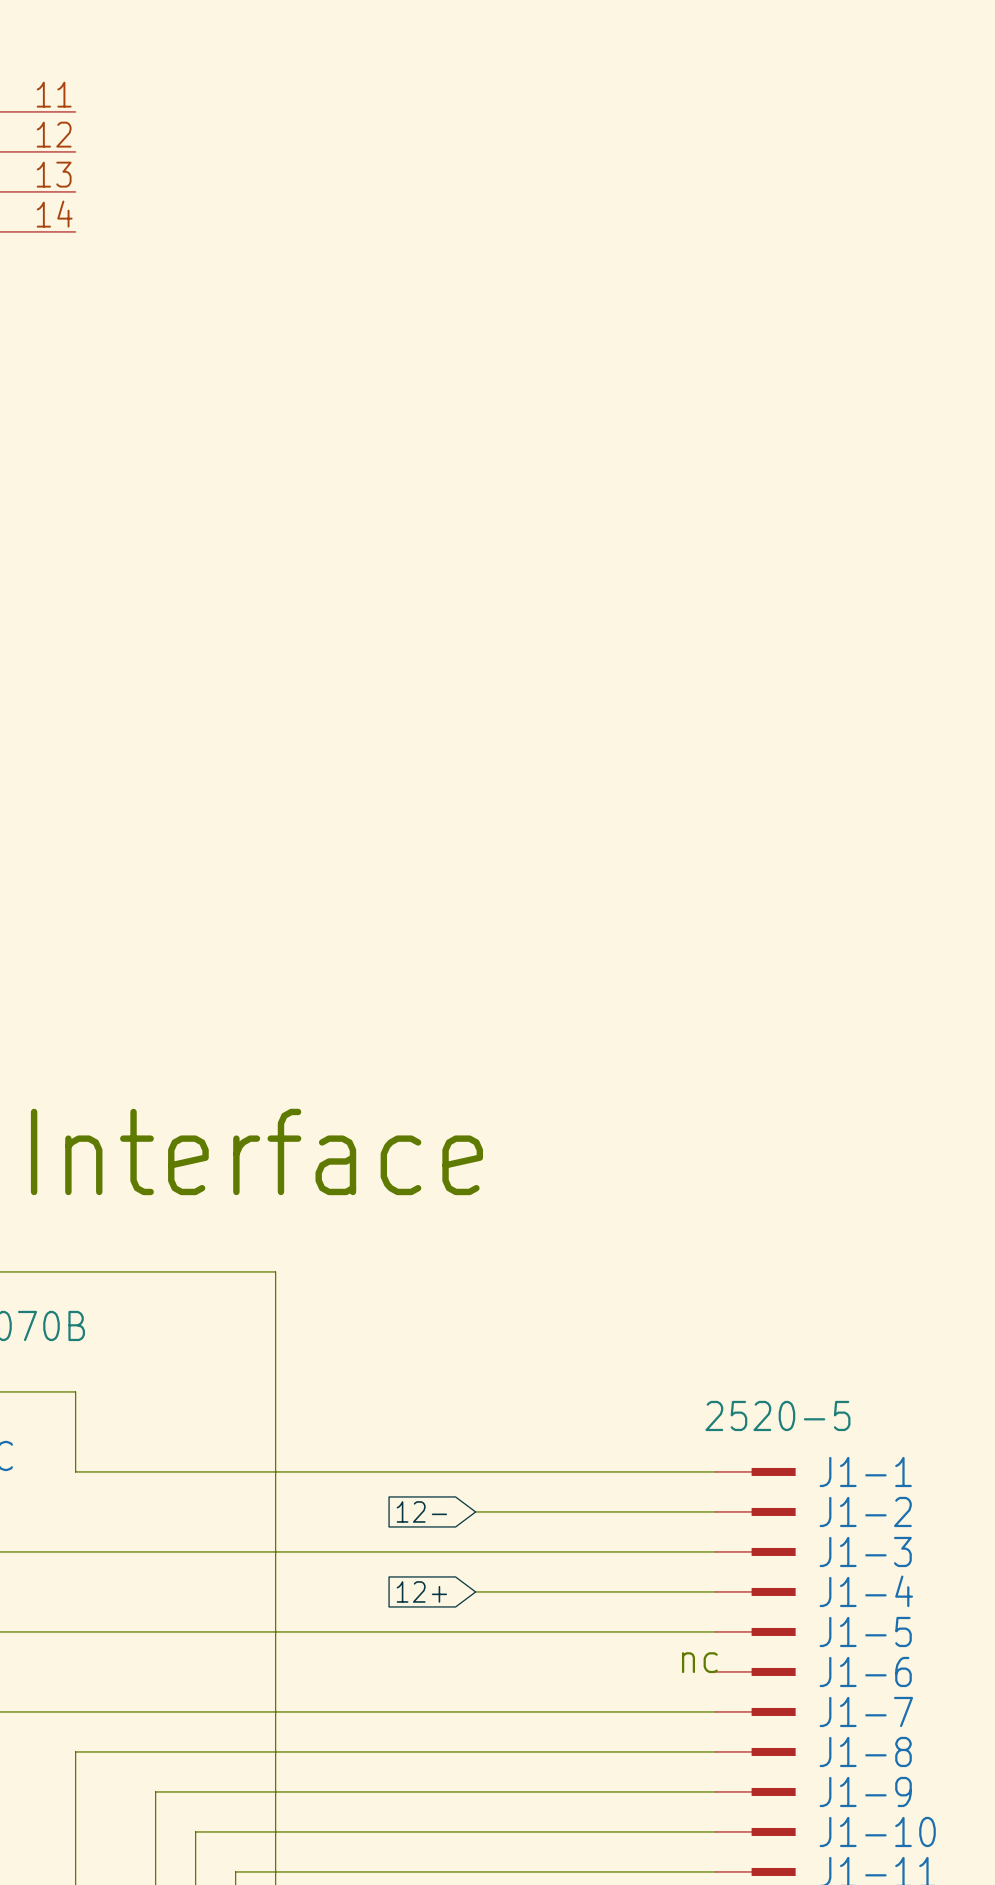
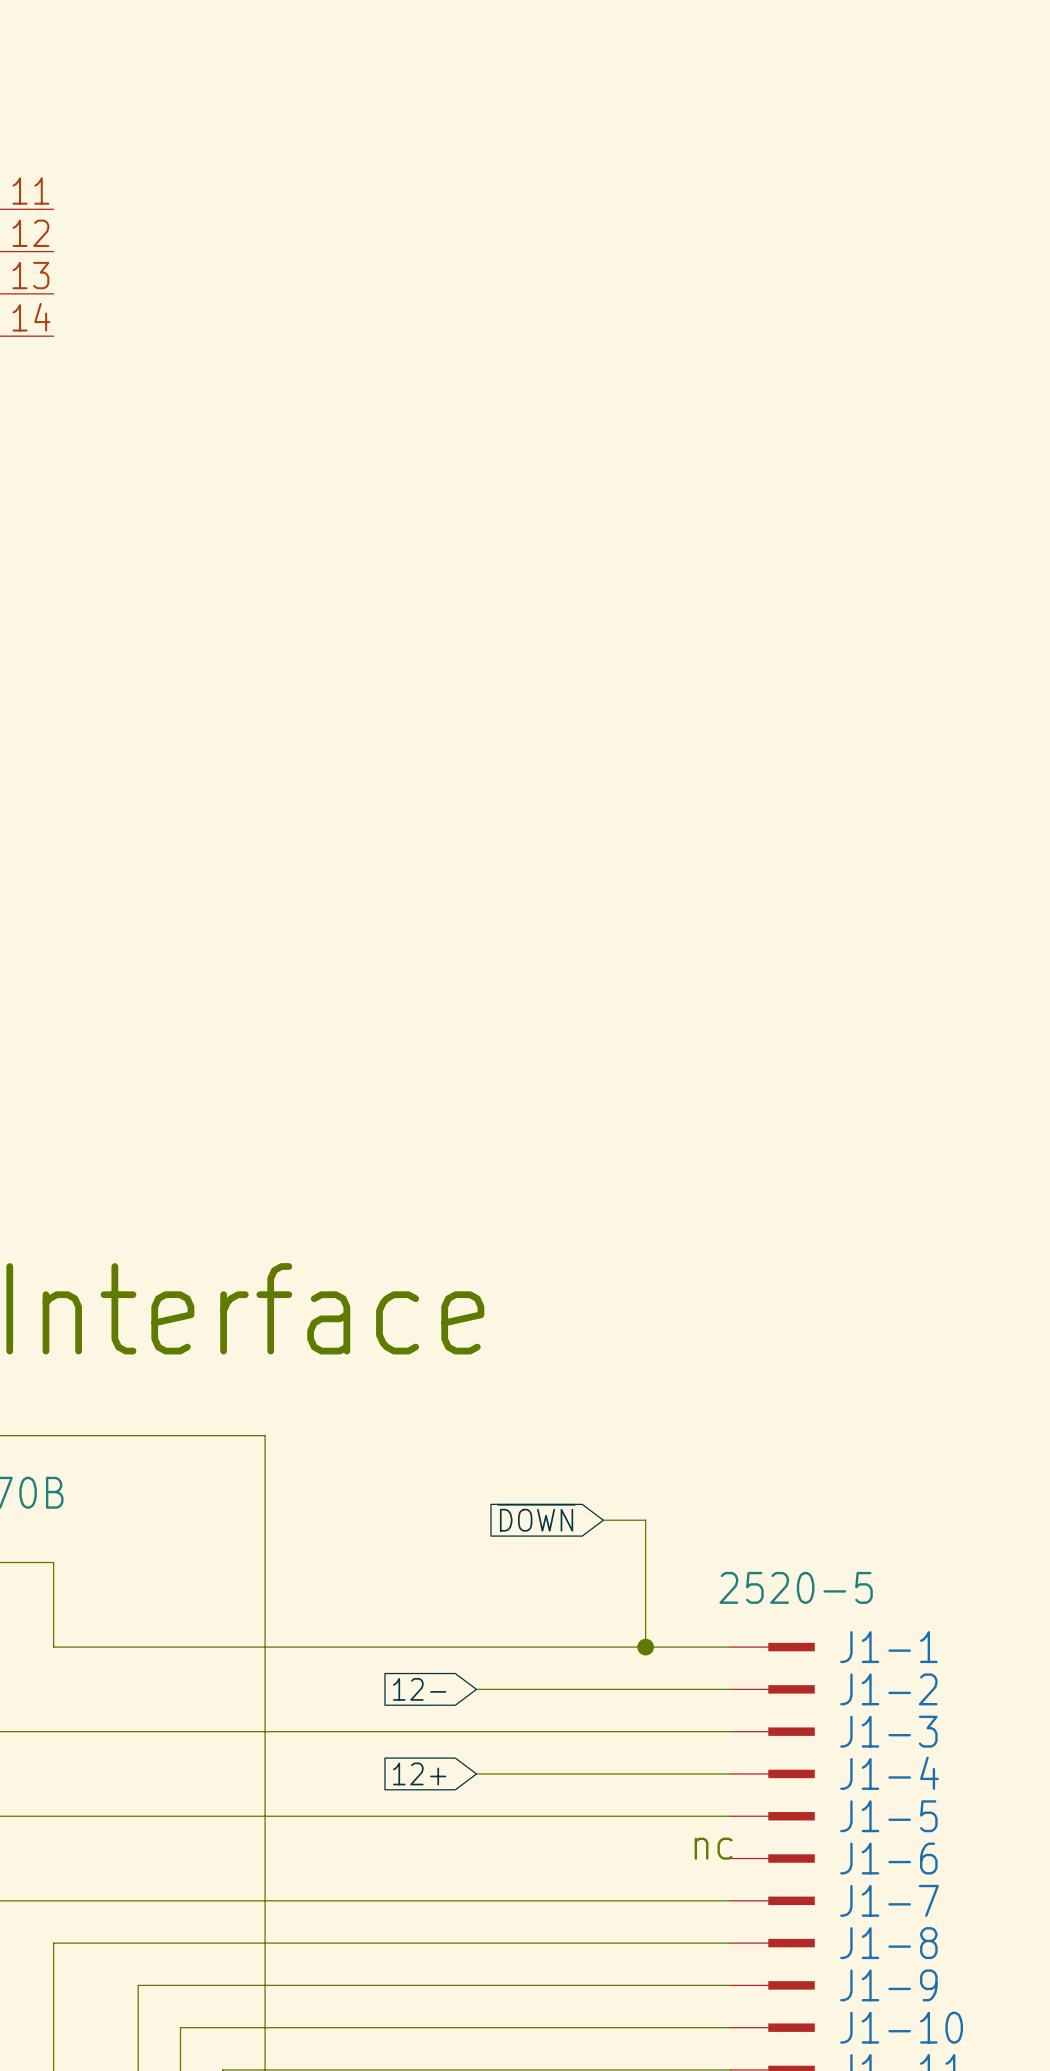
global label: none -> ~{DOWN} (536, 1517)
wire: none -> (603, 1520) (645, 1520) (645, 1647)
junction: none -> (645, 1647)

